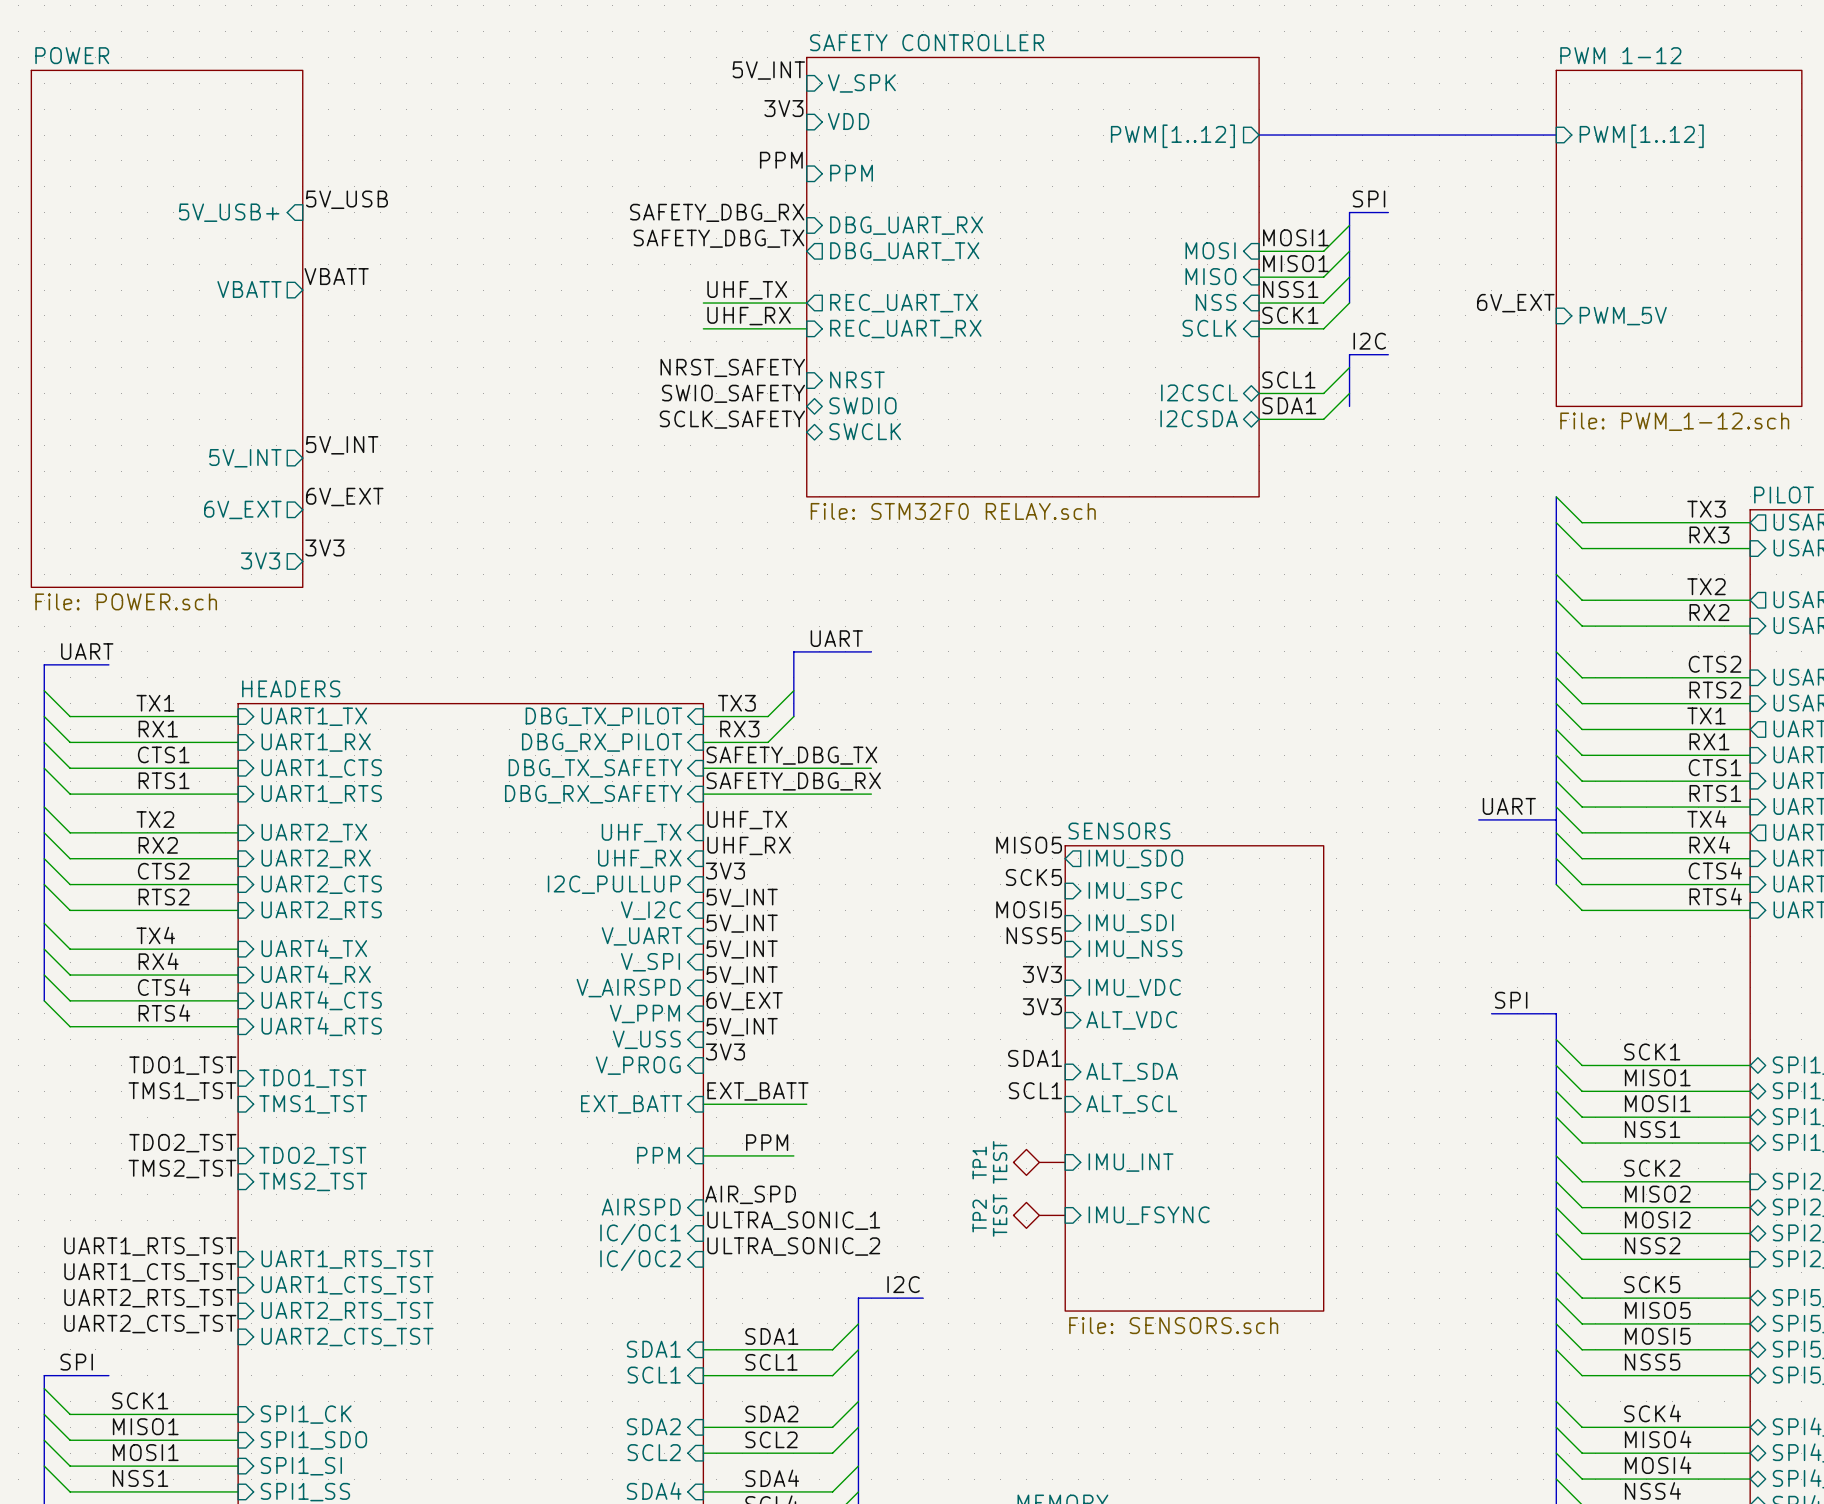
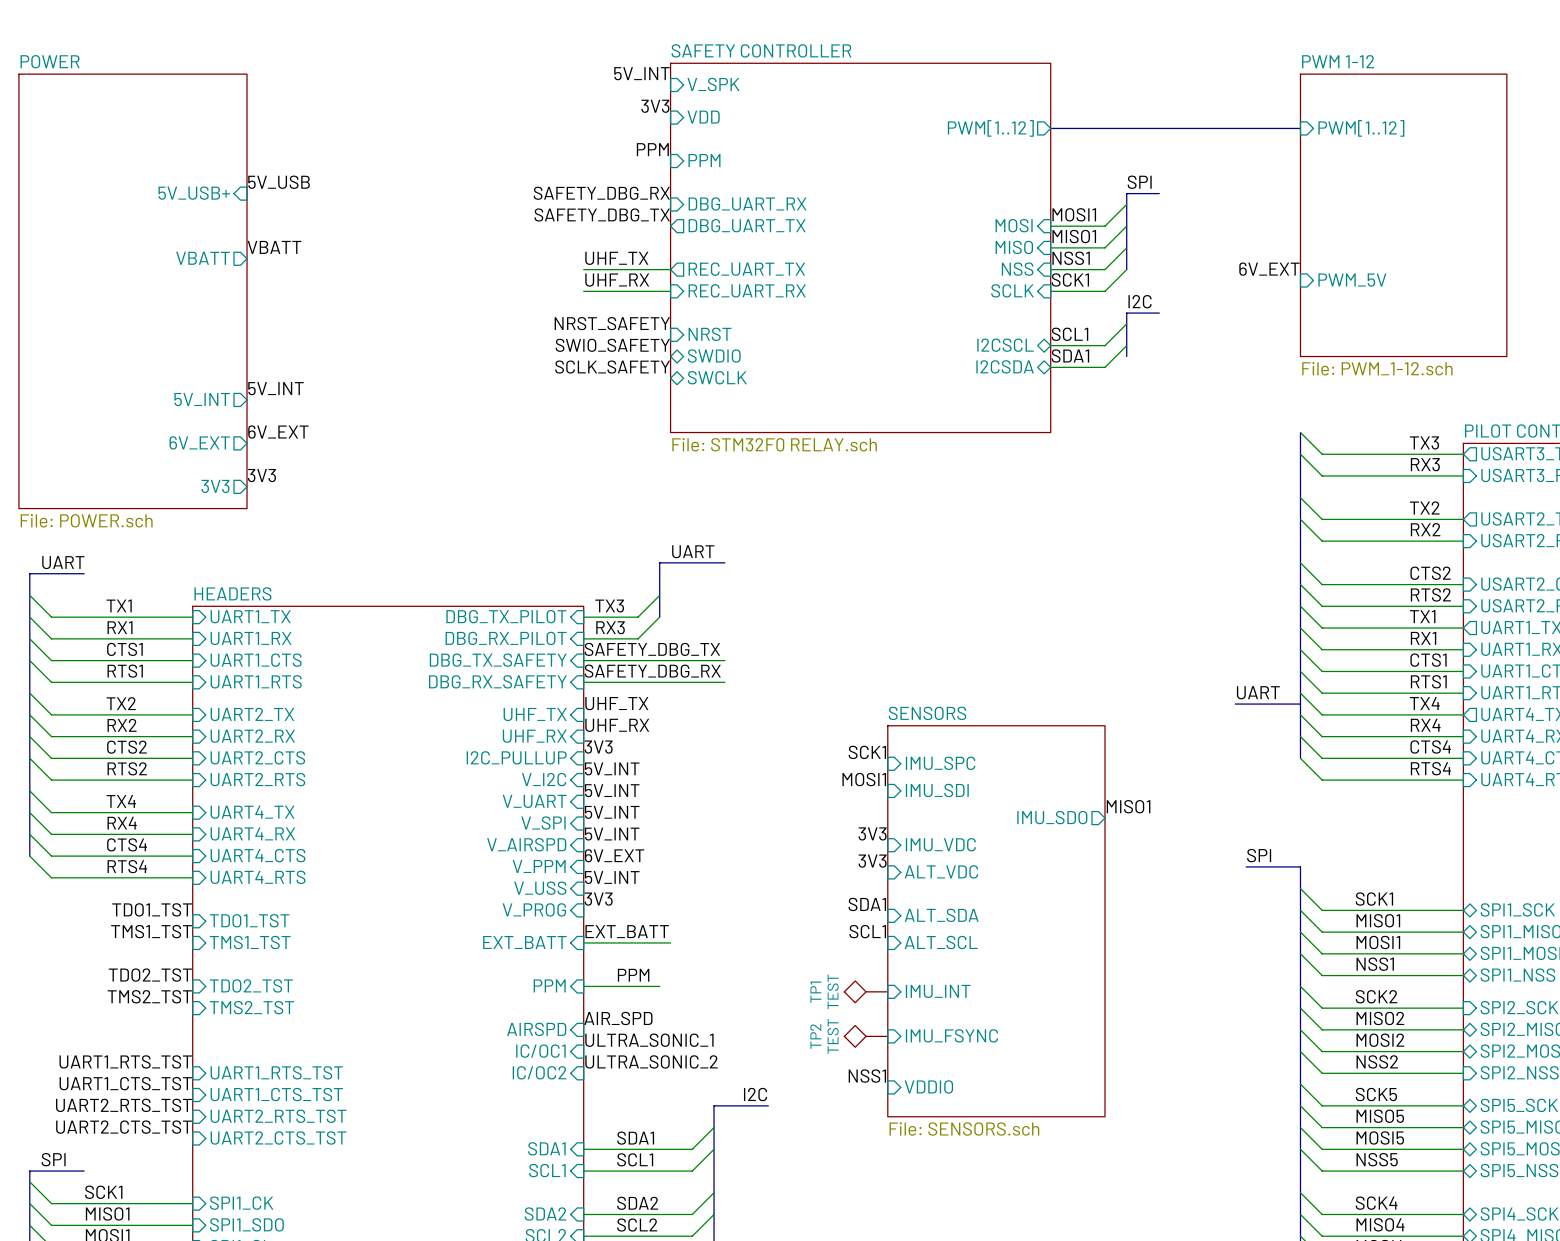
label: MISO5 (1029, 845) -> none
sheet pin rotation: 0° (1135, 858) -> 180° (1052, 817)
sheet pin position: IMU_SDO (1135, 858) -> IMU_SDO (1052, 817)
label: SCK5 (1033, 877) -> SCK1 (867, 752)
label: MOSI5 (1029, 909) -> MOSI1 (864, 779)
label: NSS5 (1034, 935) -> none
label: none -> MISO1 (1128, 806)
sheet pin: IMU_NSS (1135, 949) -> none
label: none -> NSS1 (867, 1076)
sheet pin: none -> VDDIO (928, 1086)

